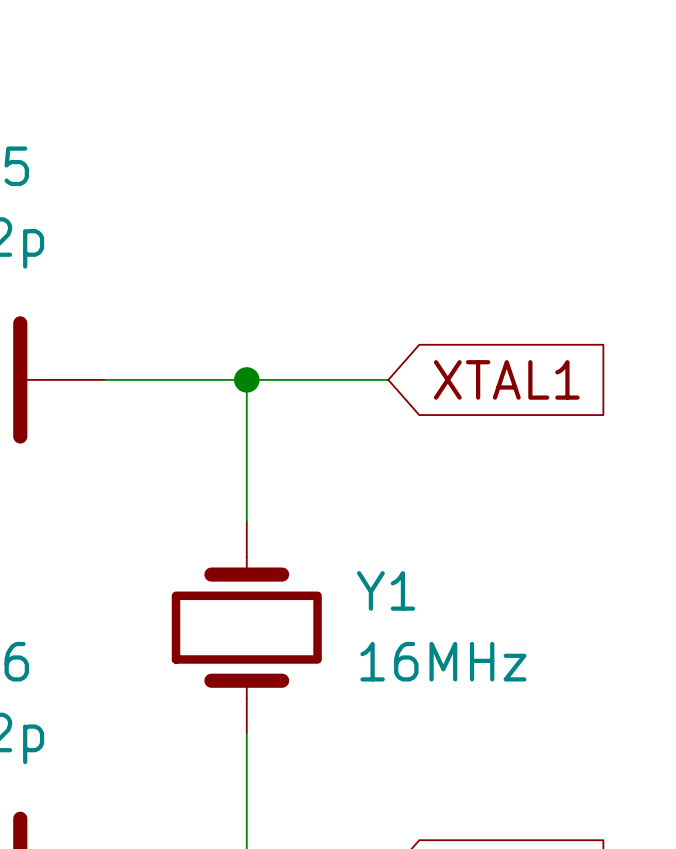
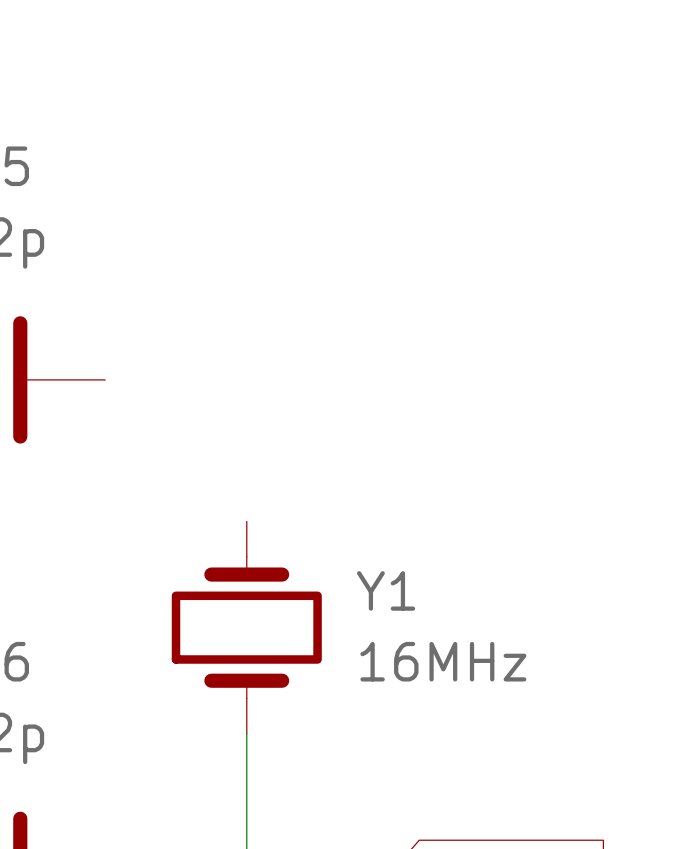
wire: (105, 379) (388, 379) -> none
wire: (246, 379) (246, 521) -> none
junction: (246, 379) -> none
global label: XTAL1 (506, 379) -> none

